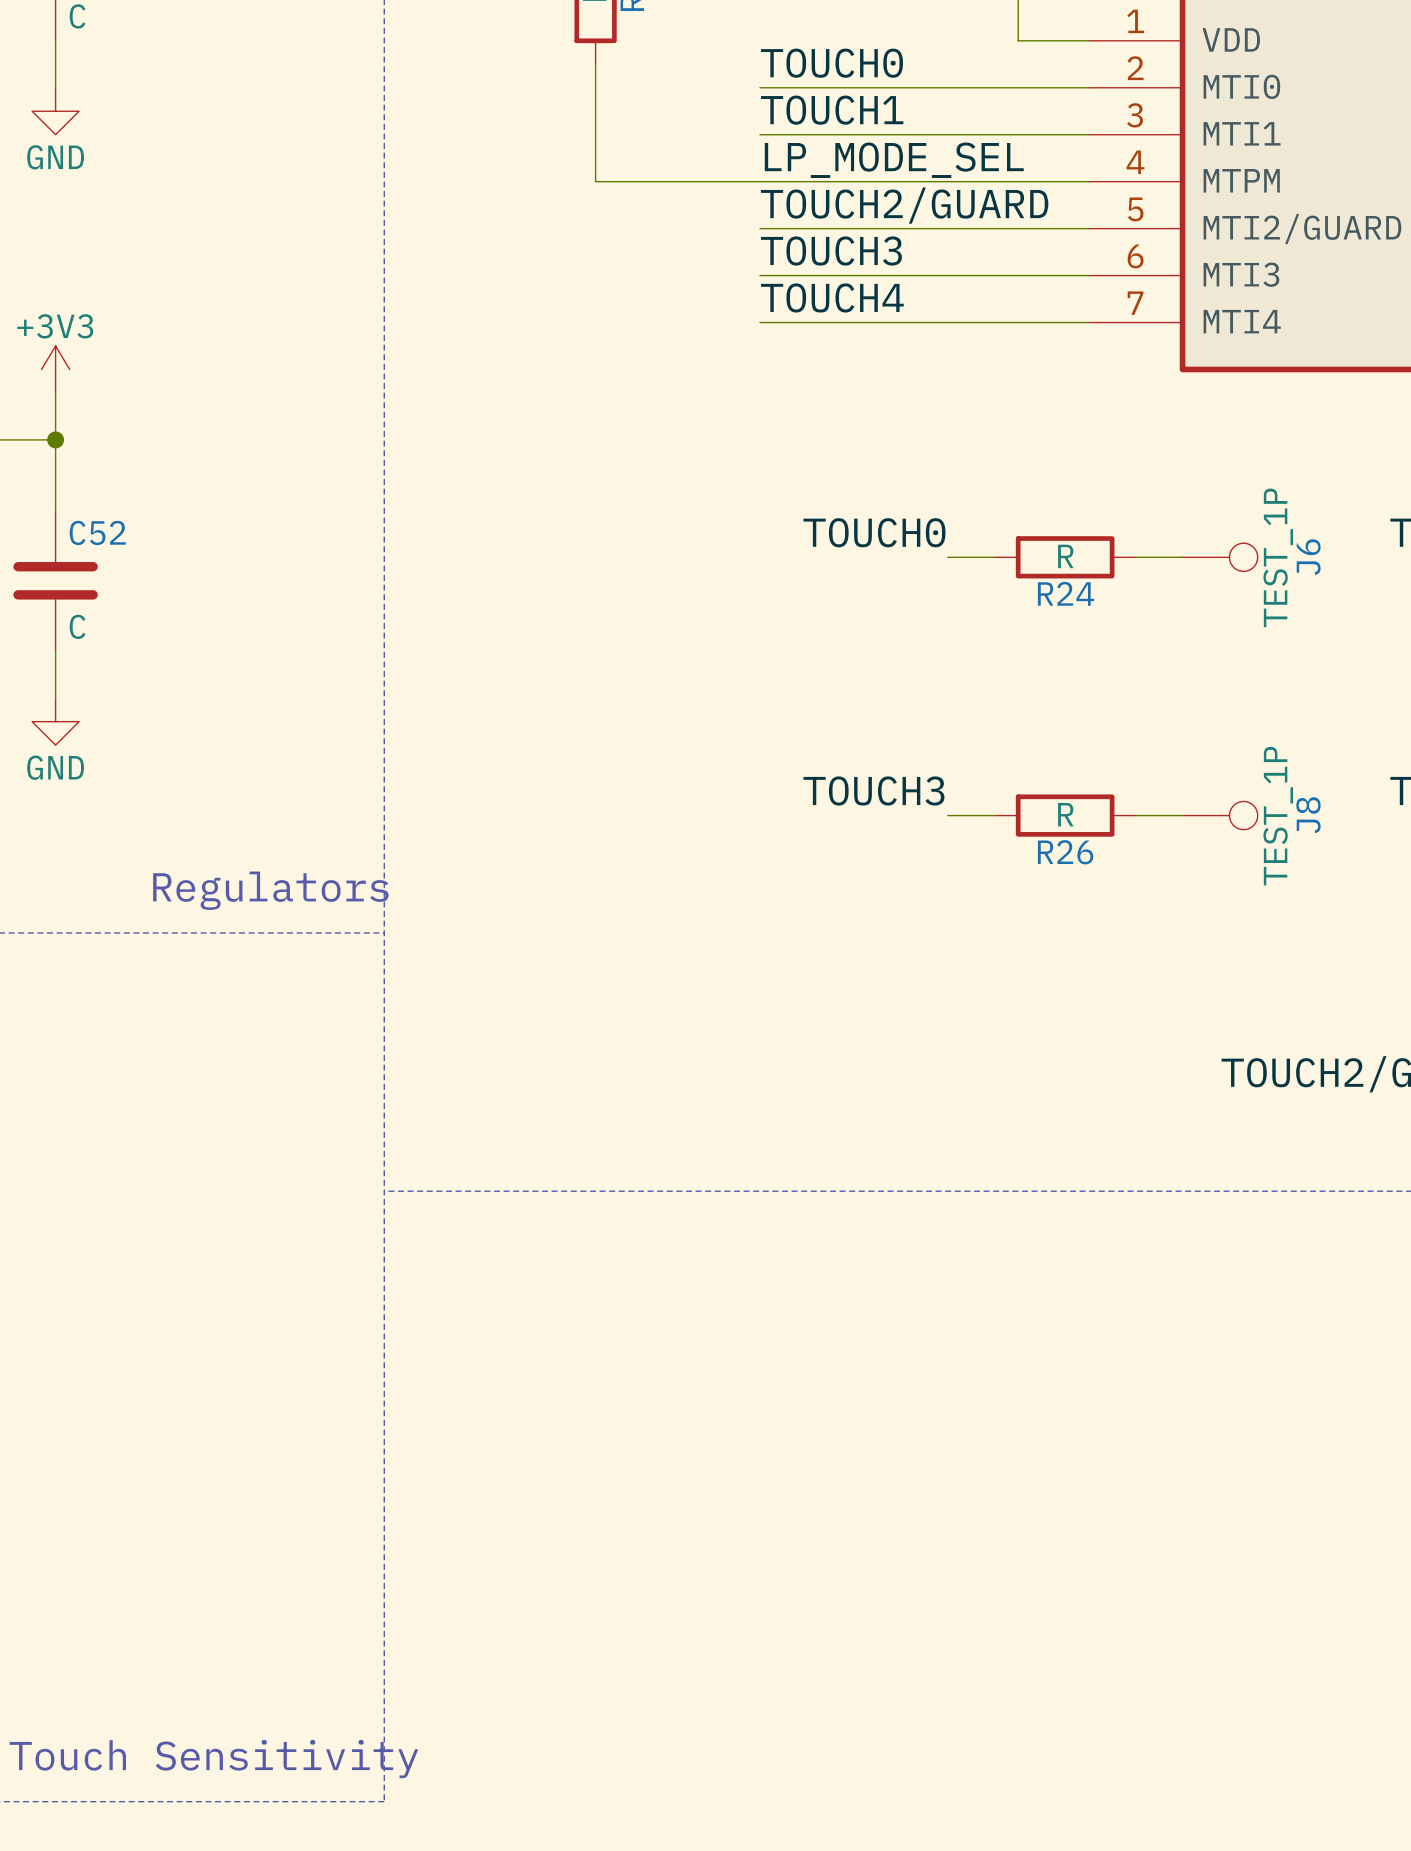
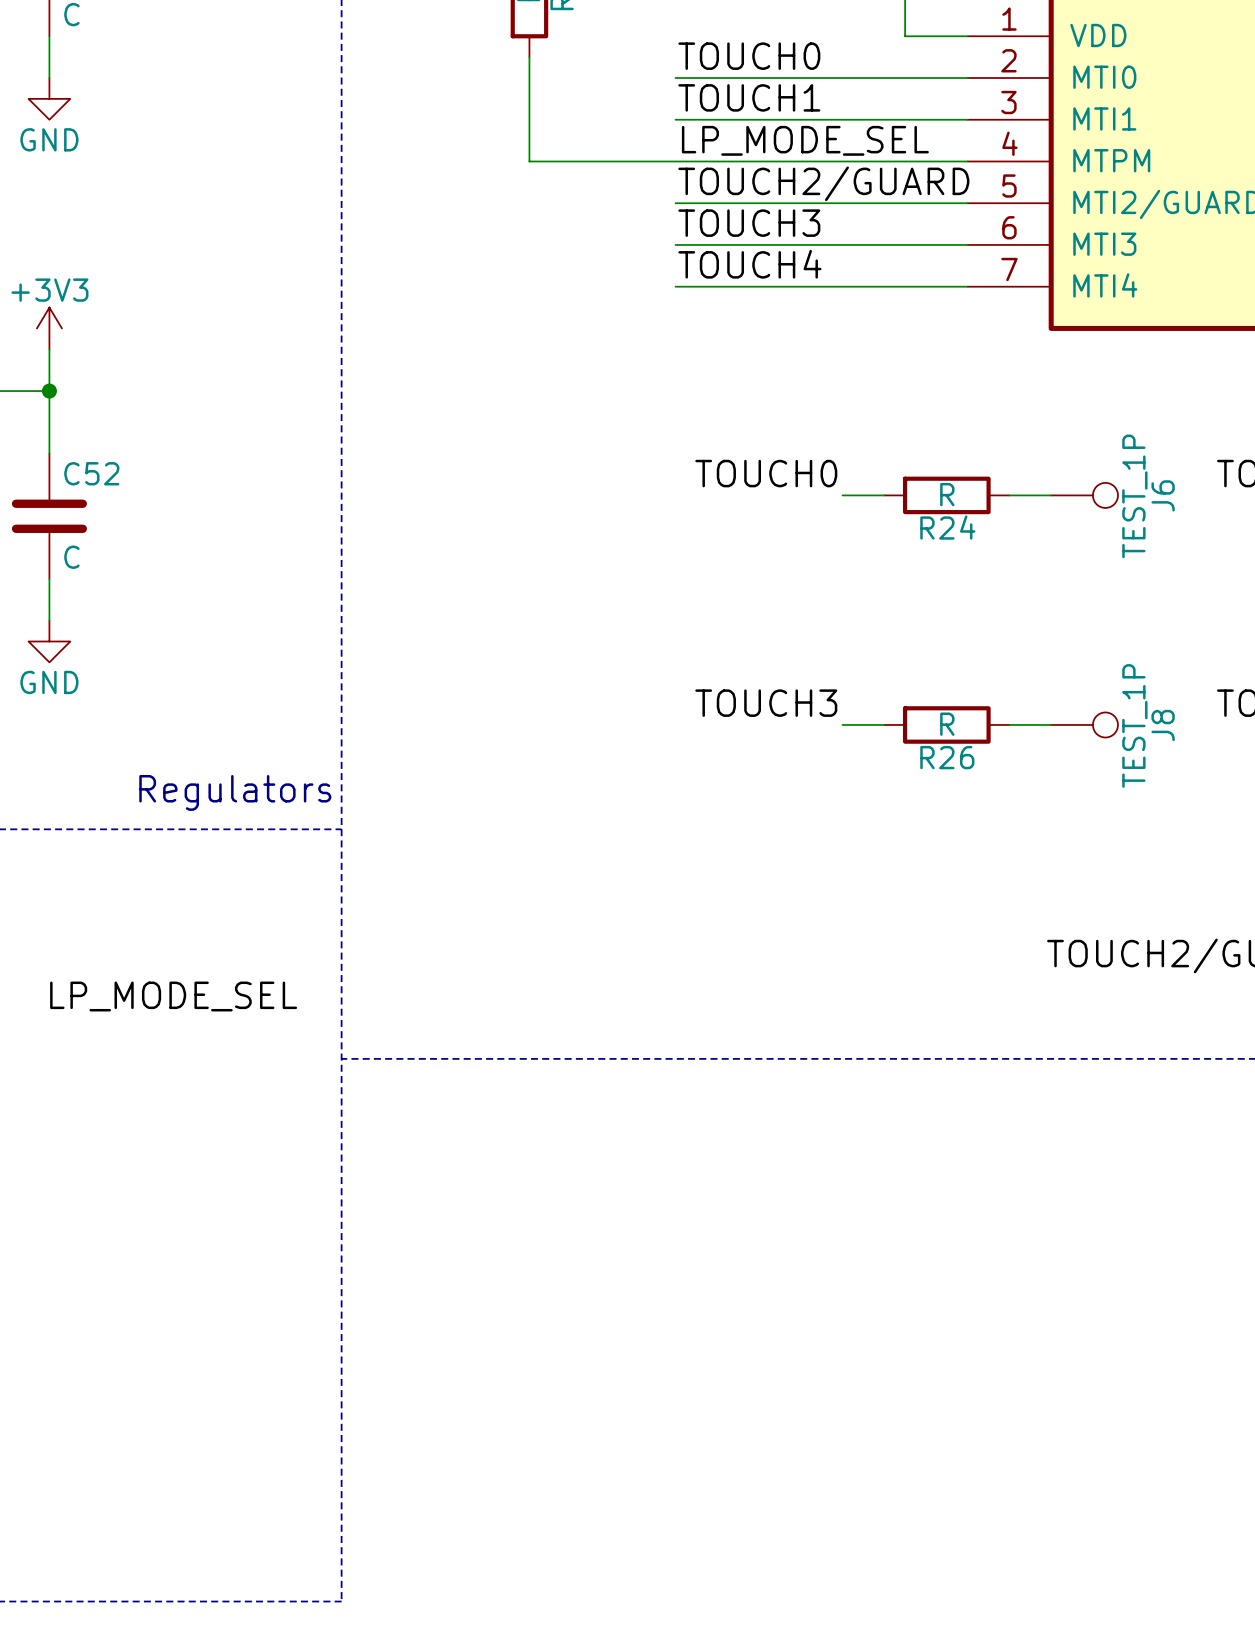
label: none -> LP_MODE_SEL (173, 996)
text: Touch Sensitivity (213, 1759) -> none

